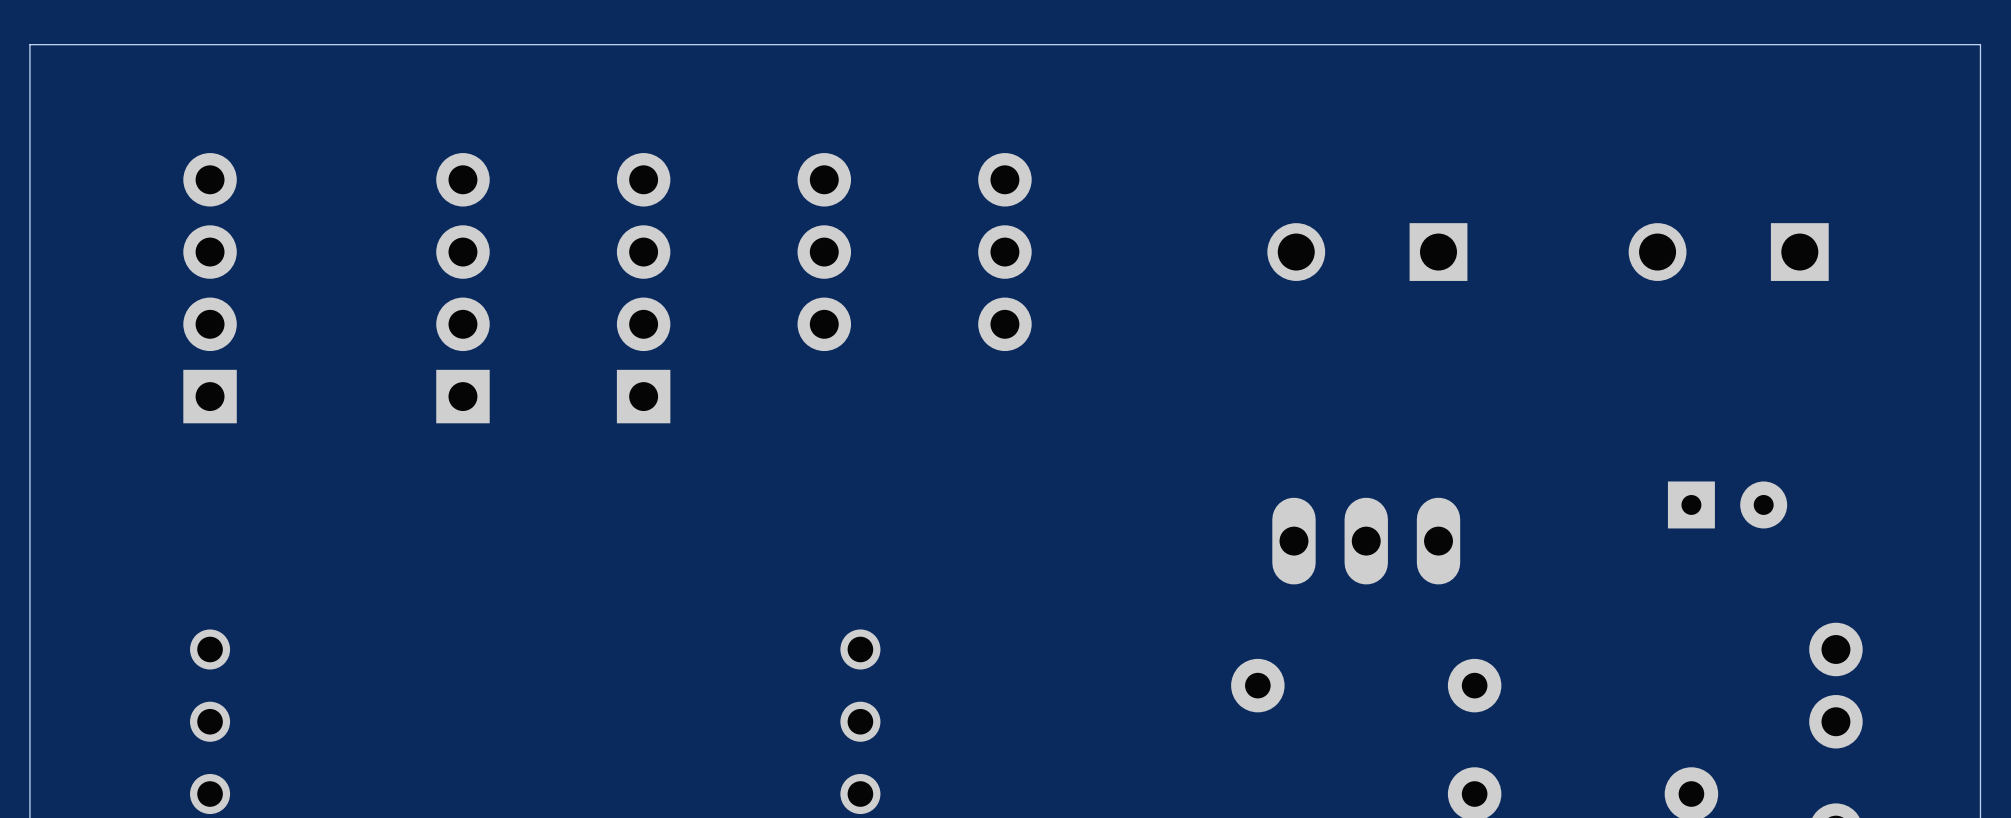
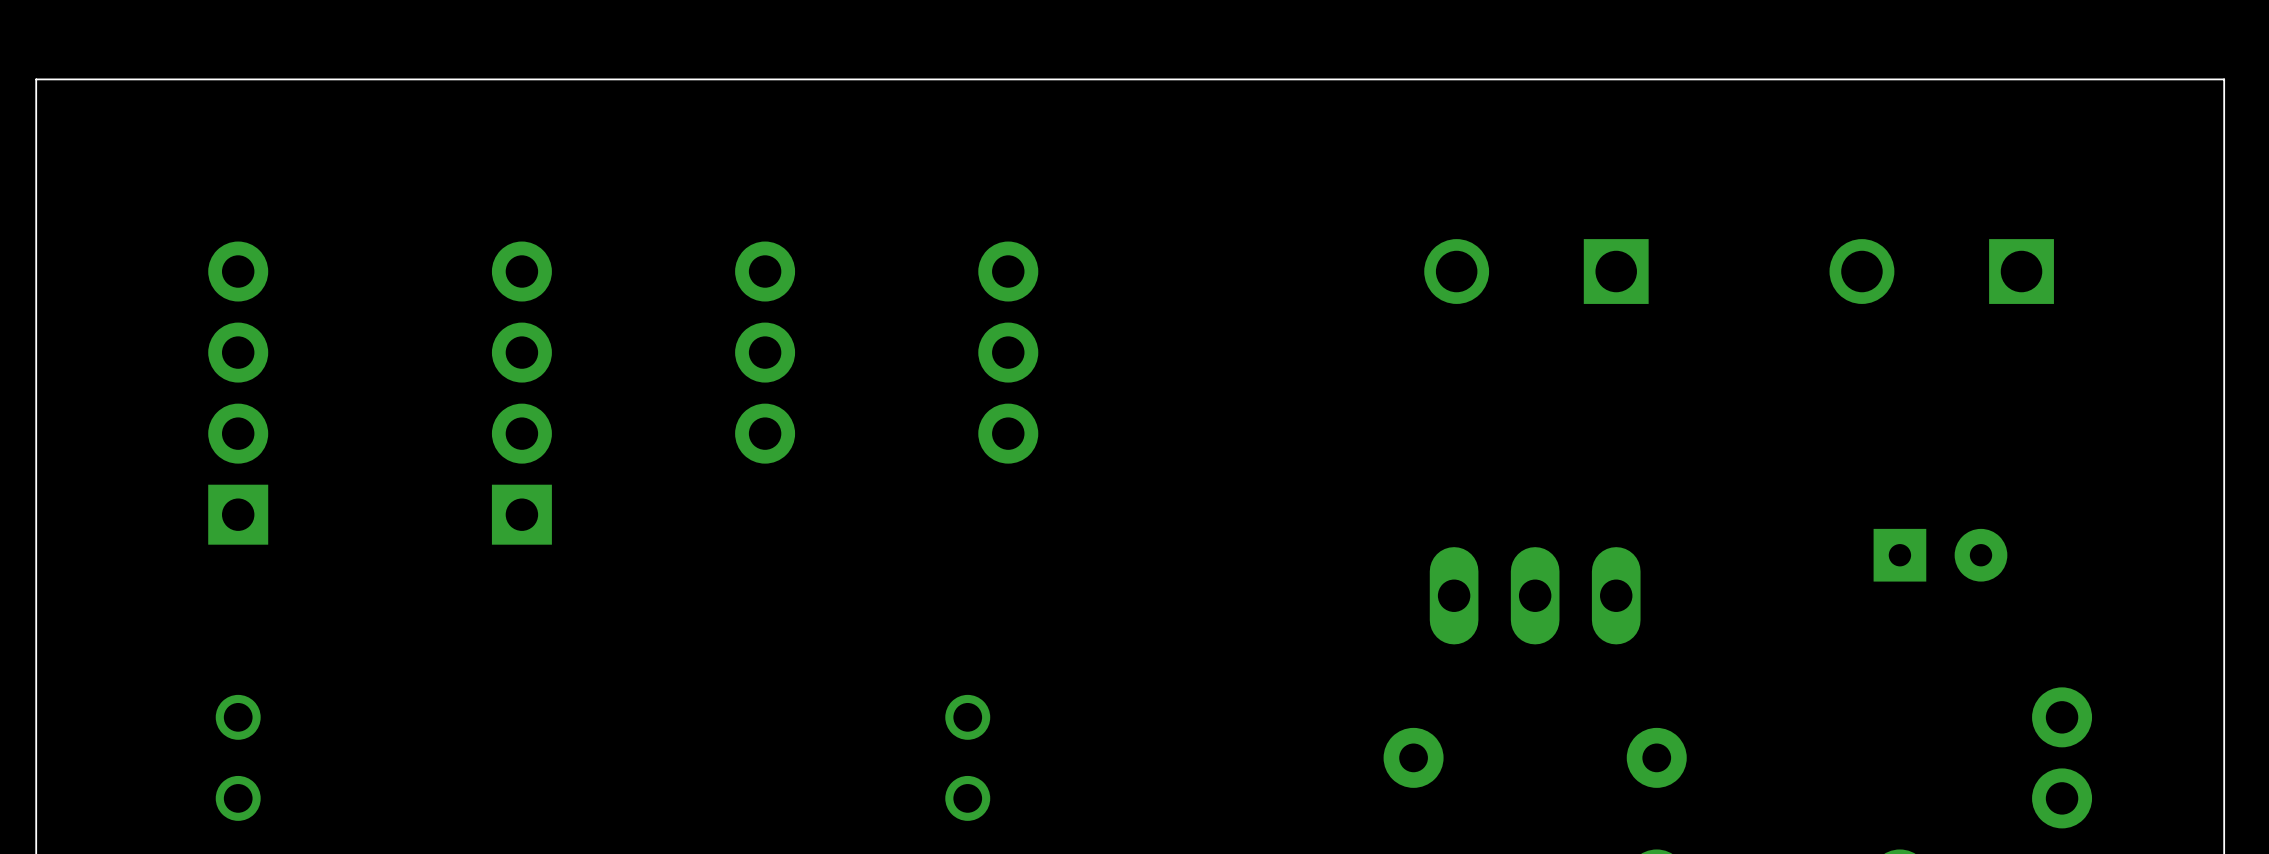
board edge: (1980, 80) (1980, 44) (29, 44) (29, 80) -> (2224, 79) (36, 79)
part: (824, 252) -> none
part: (1004, 252) -> none
part position: (210, 288) -> (238, 393)
part position: (462, 288) -> (521, 393)
part: (643, 288) -> none
part: none -> (765, 352)
part: none -> (1008, 352)

